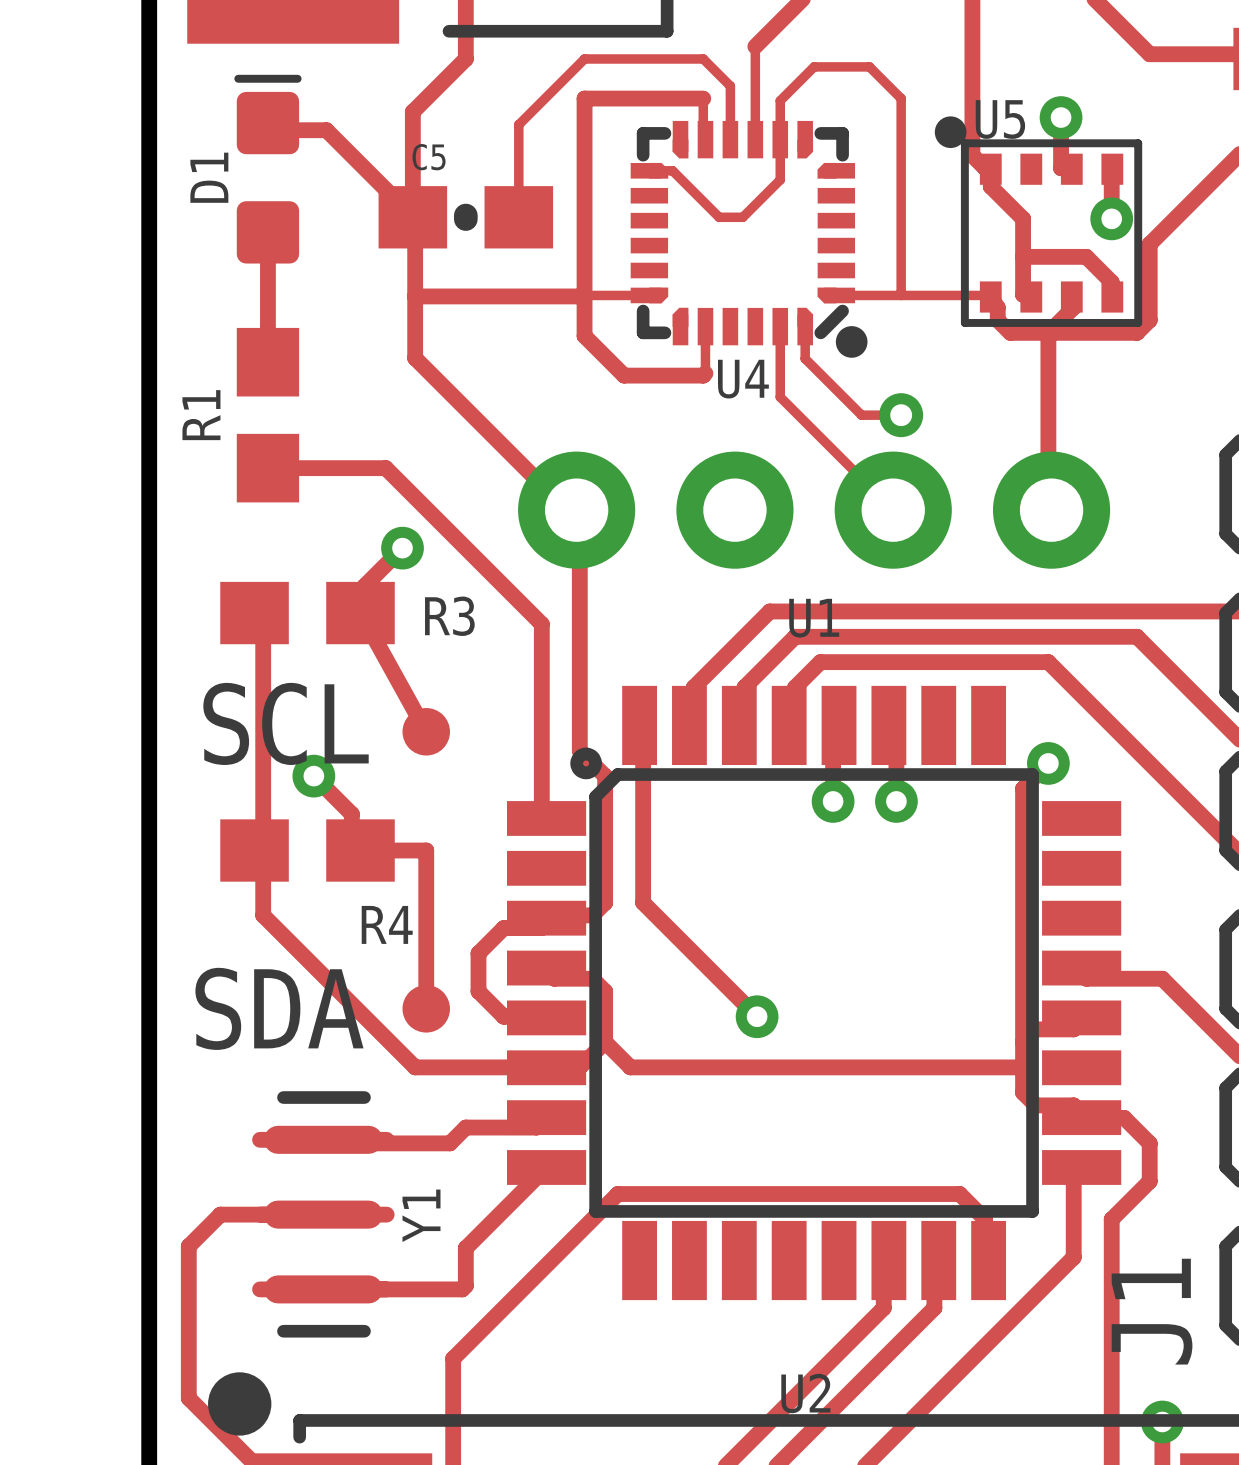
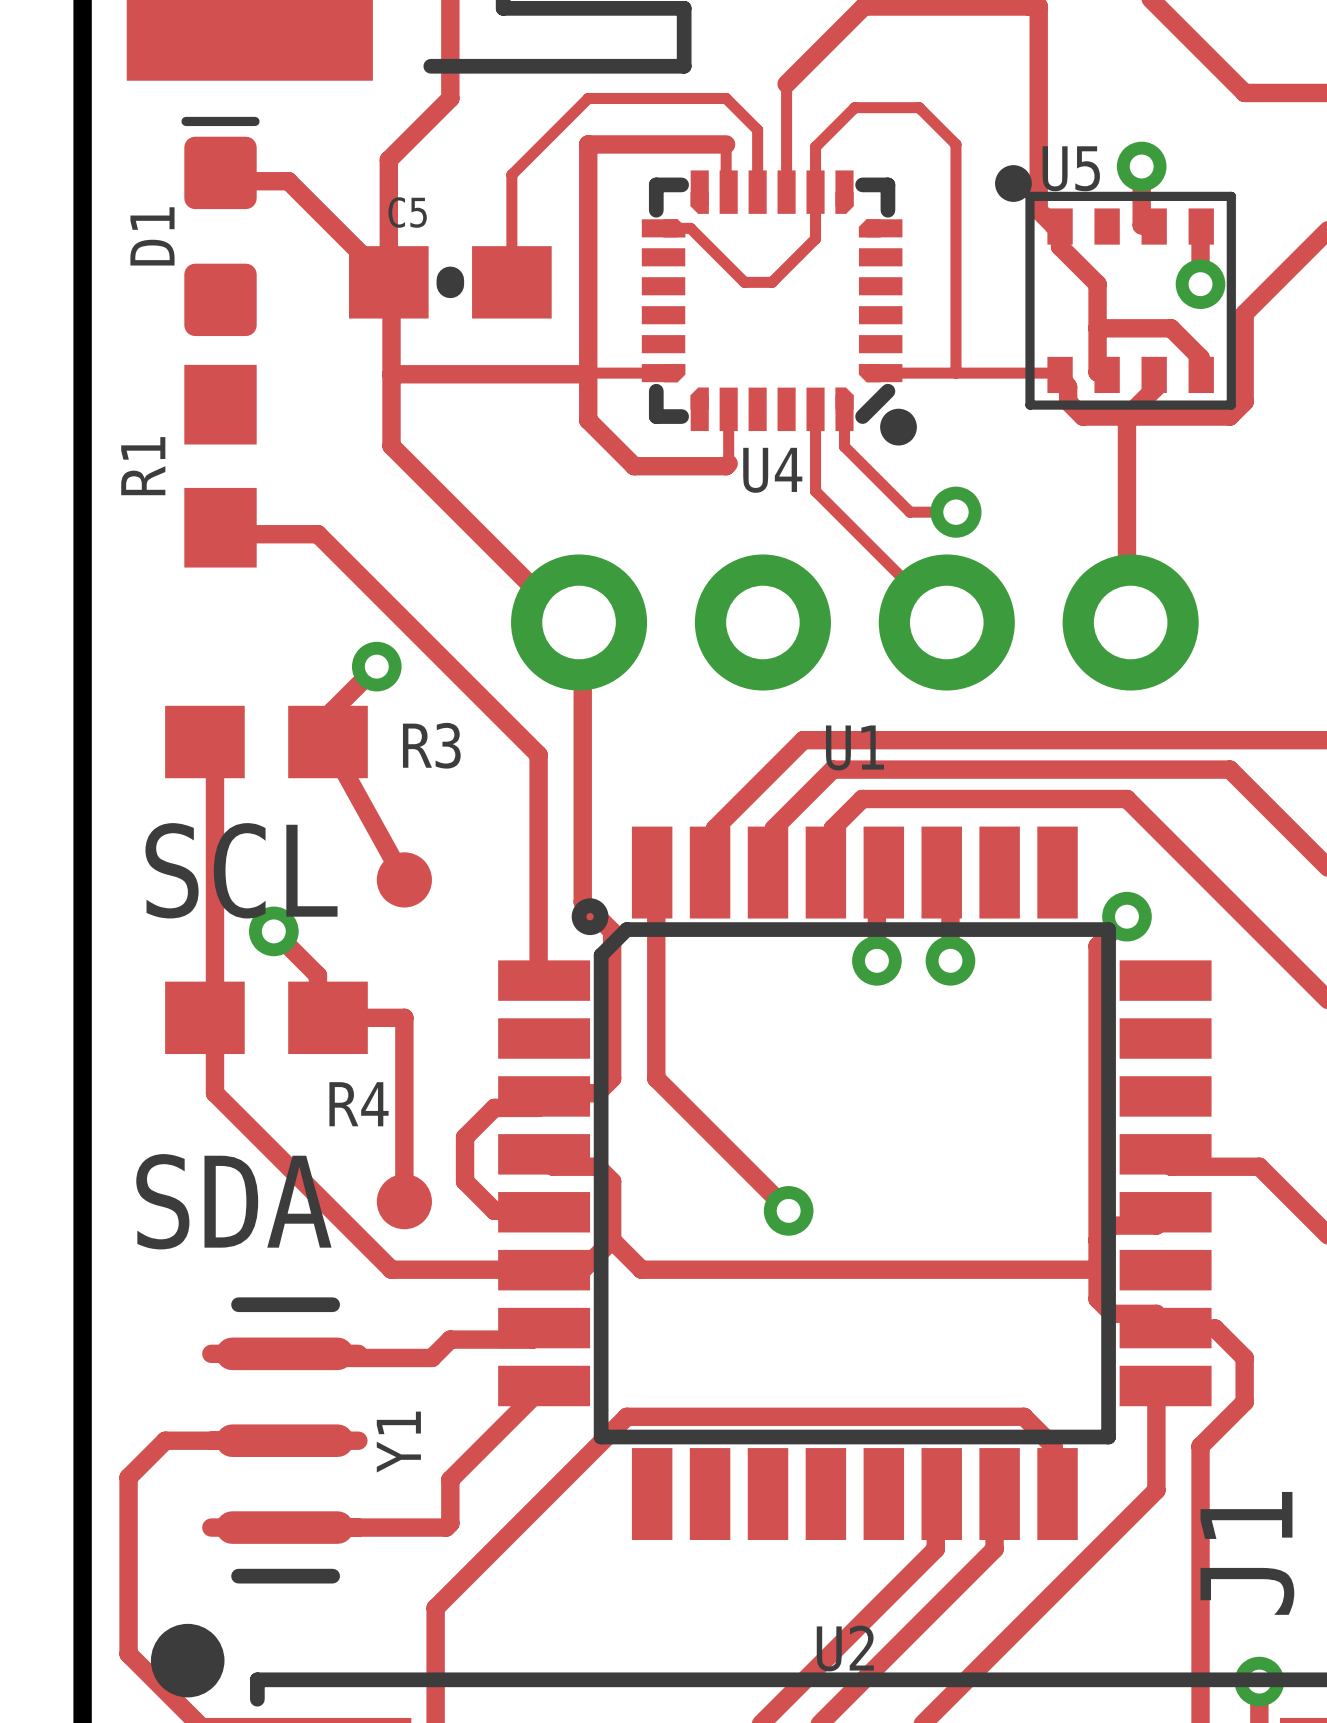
track: (267, 232) (267, 355) (263, 359) (267, 362) -> none
R1 position: (267, 415) -> (220, 466)
track: (267, 468) (385, 468) -> (220, 527) (229, 534) (317, 534) (357, 573)

